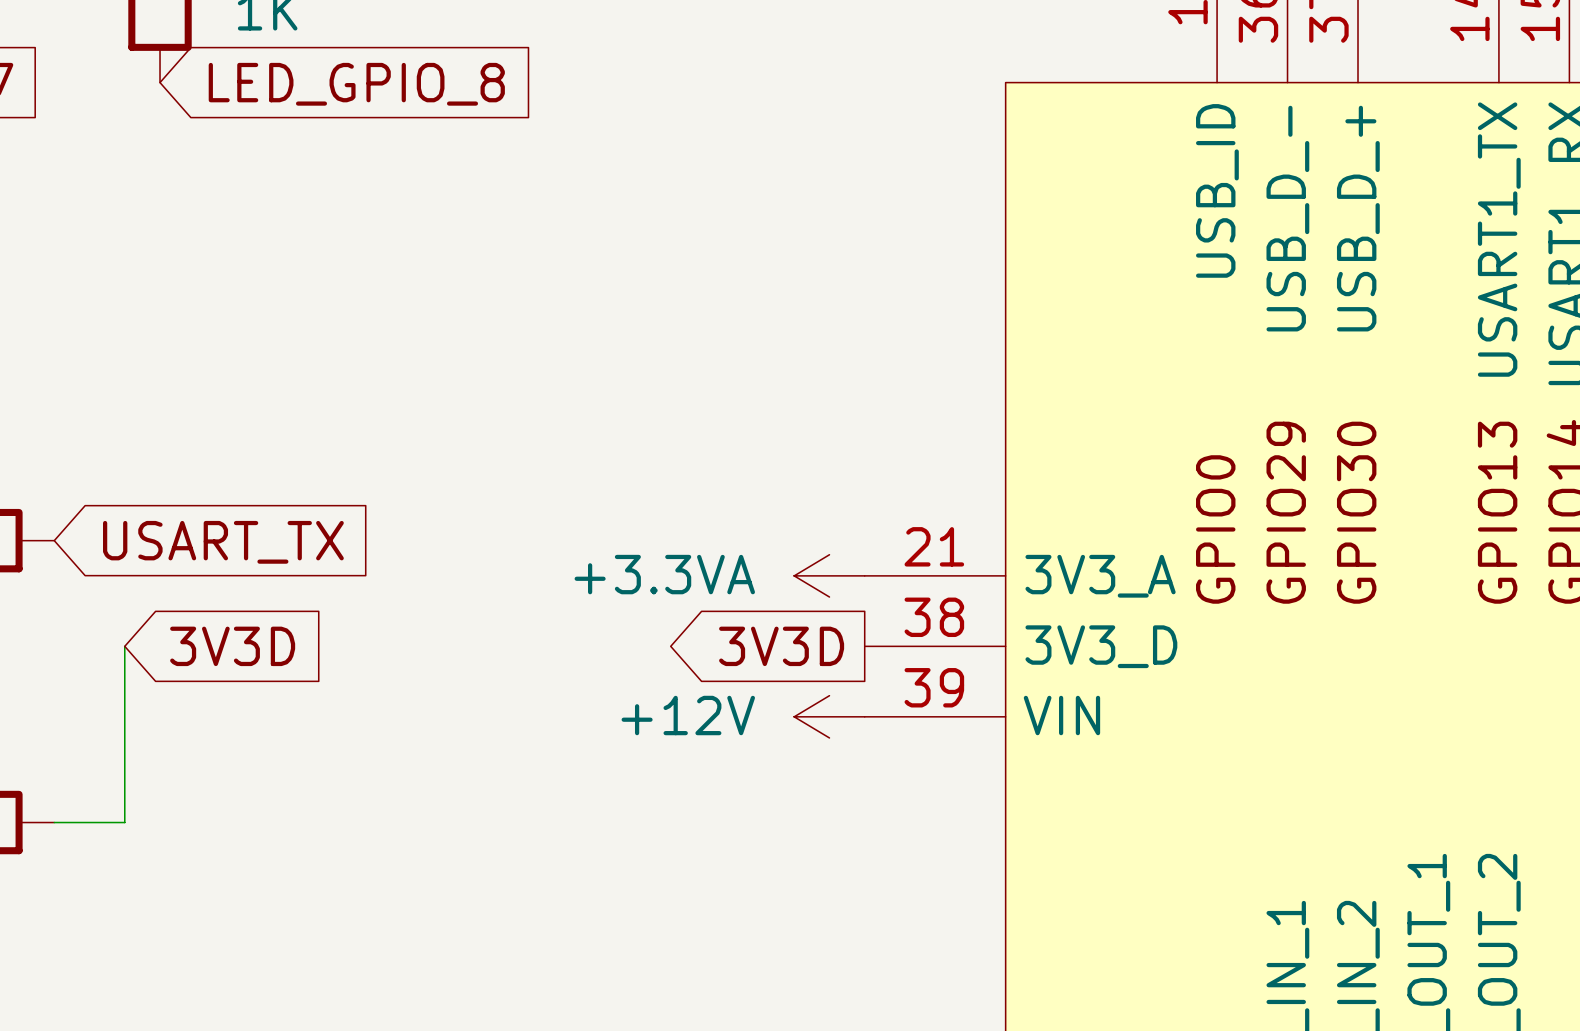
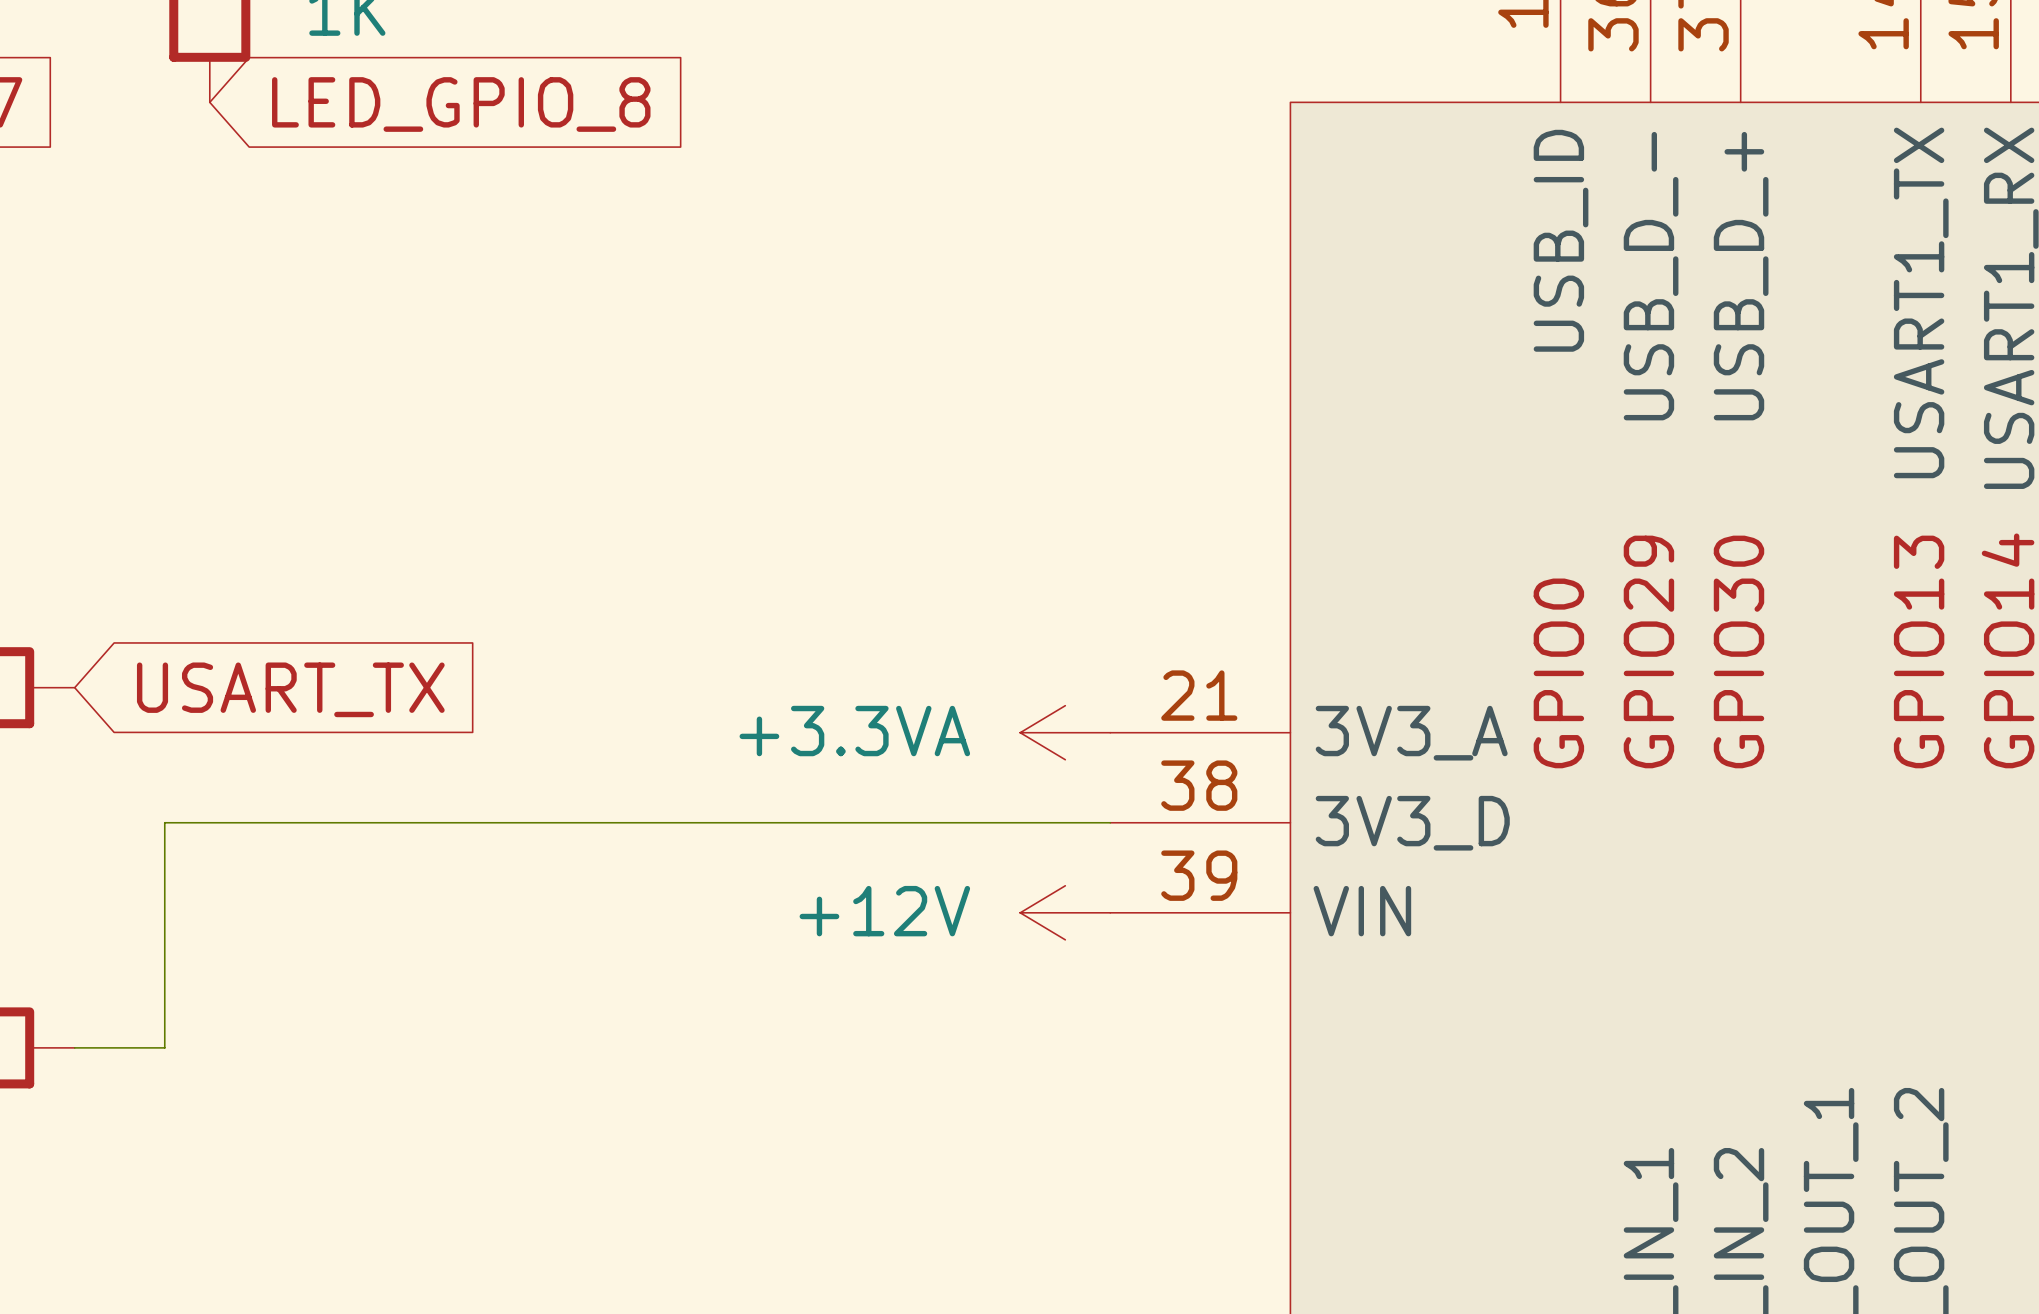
wire: none -> (164, 822) (1110, 822)
global label: 3V3D (232, 646) -> none
global label: 3V3D (781, 646) -> none

